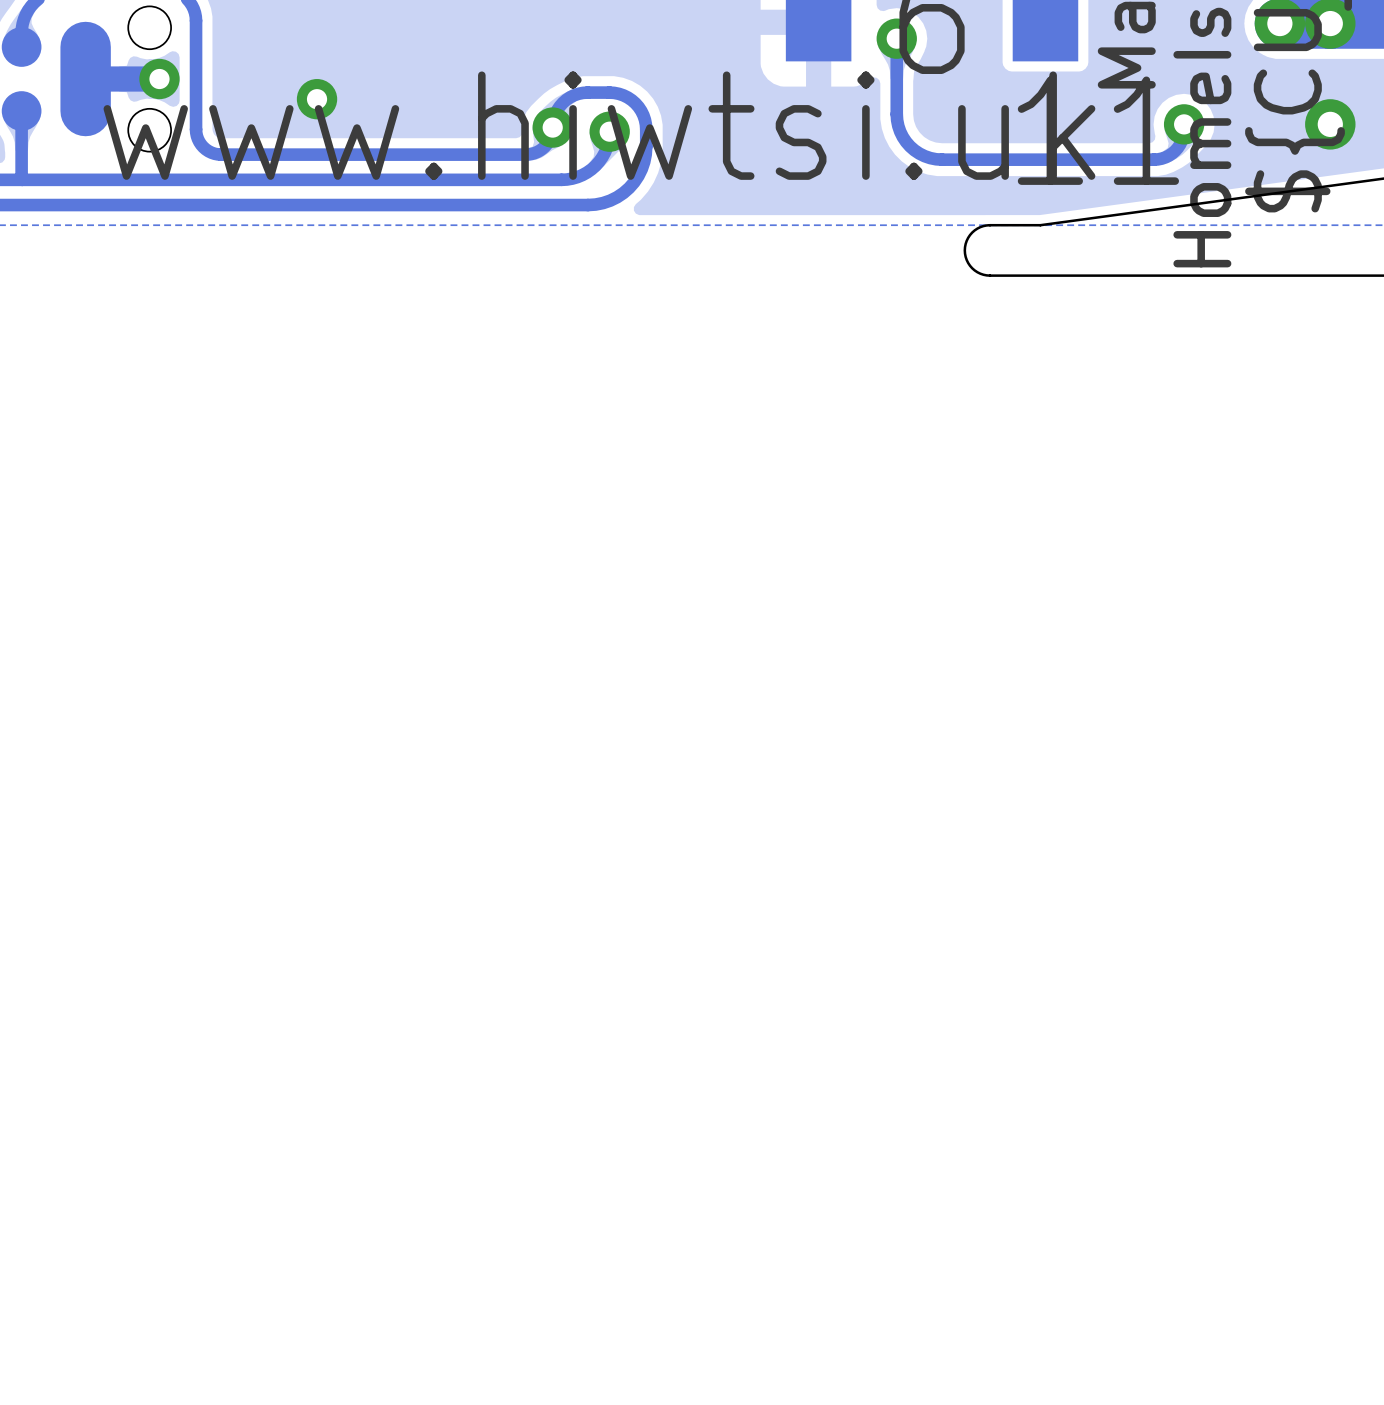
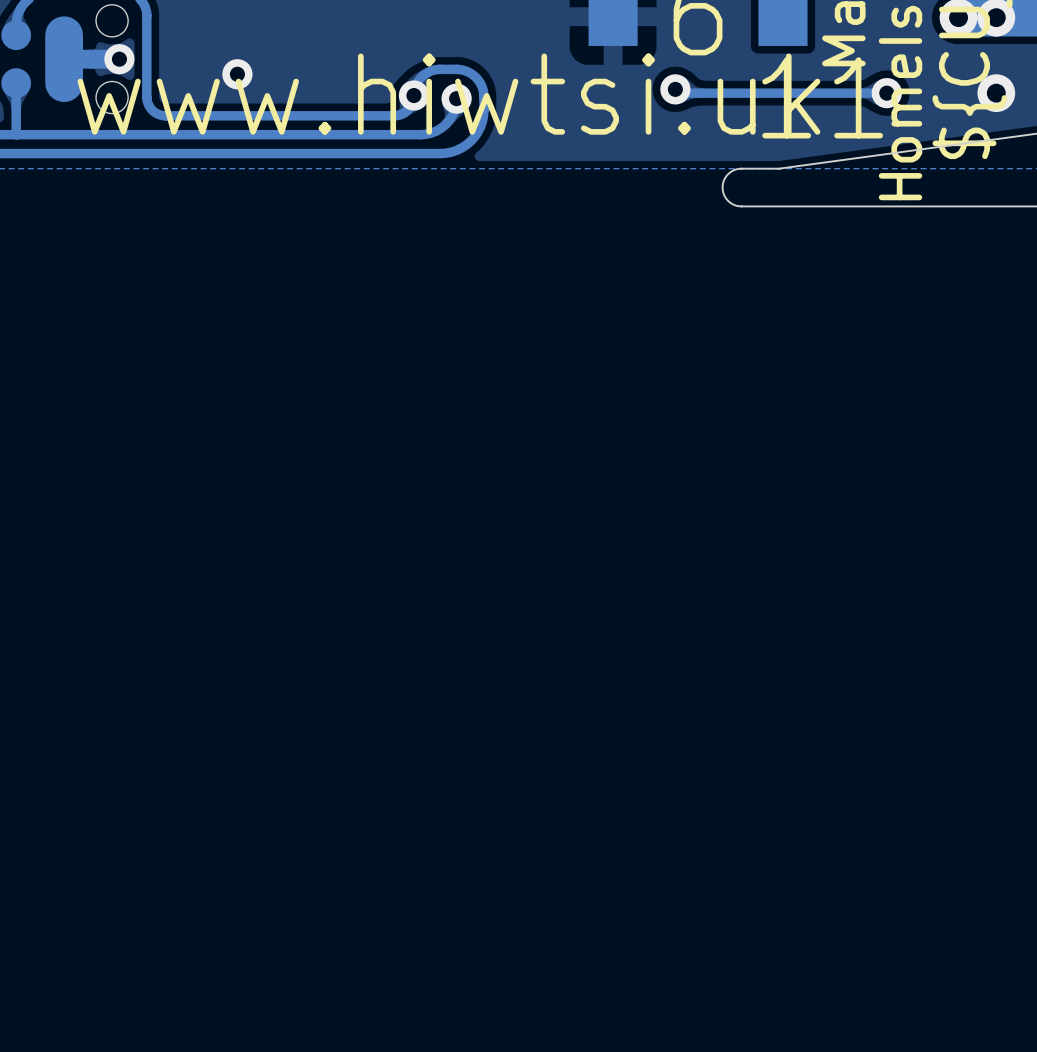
track: (896, 38) (898, 126) (902, 136) (910, 146) (919, 153) (930, 158) (1157, 159) (1168, 155) (1177, 147) (1183, 137) (1184, 124) -> (675, 89) (684, 93) (886, 93)
via position: (896, 38) -> (675, 89)

